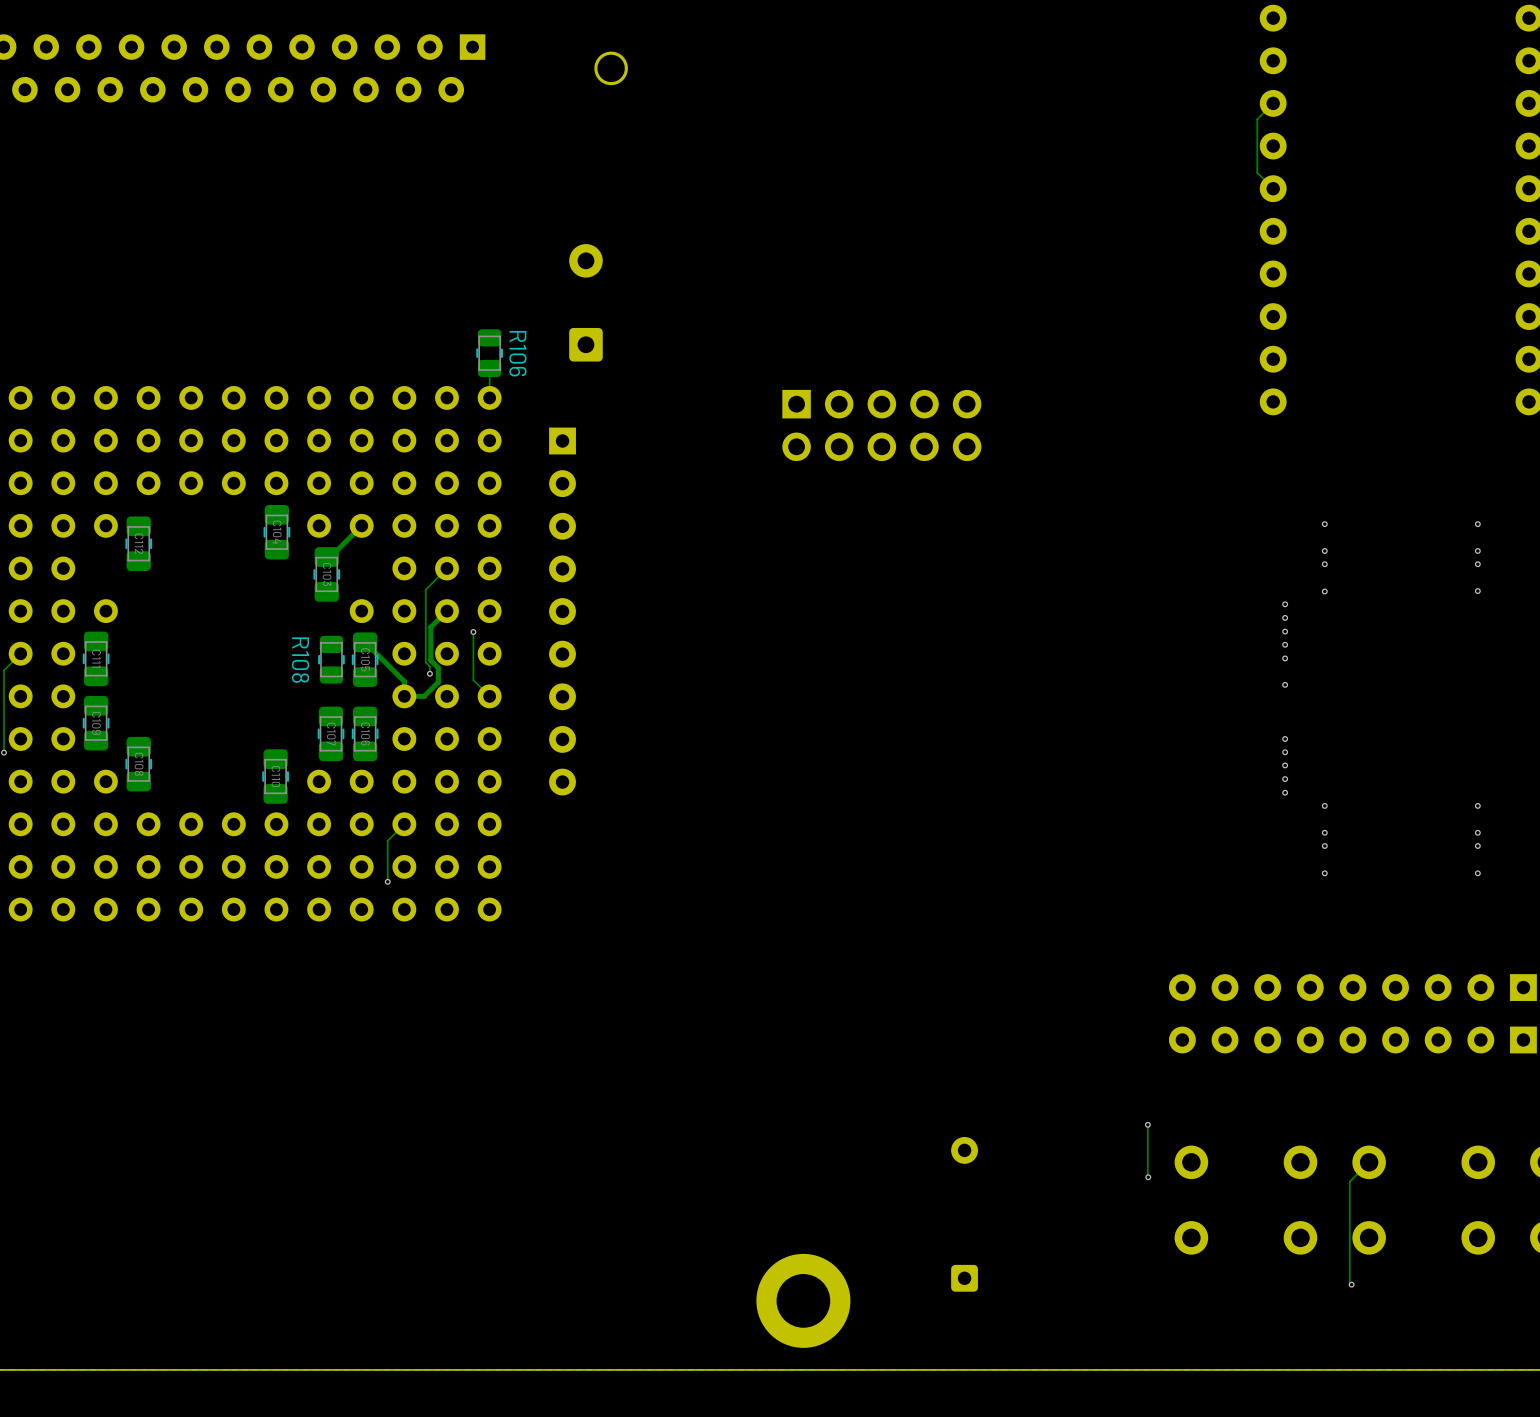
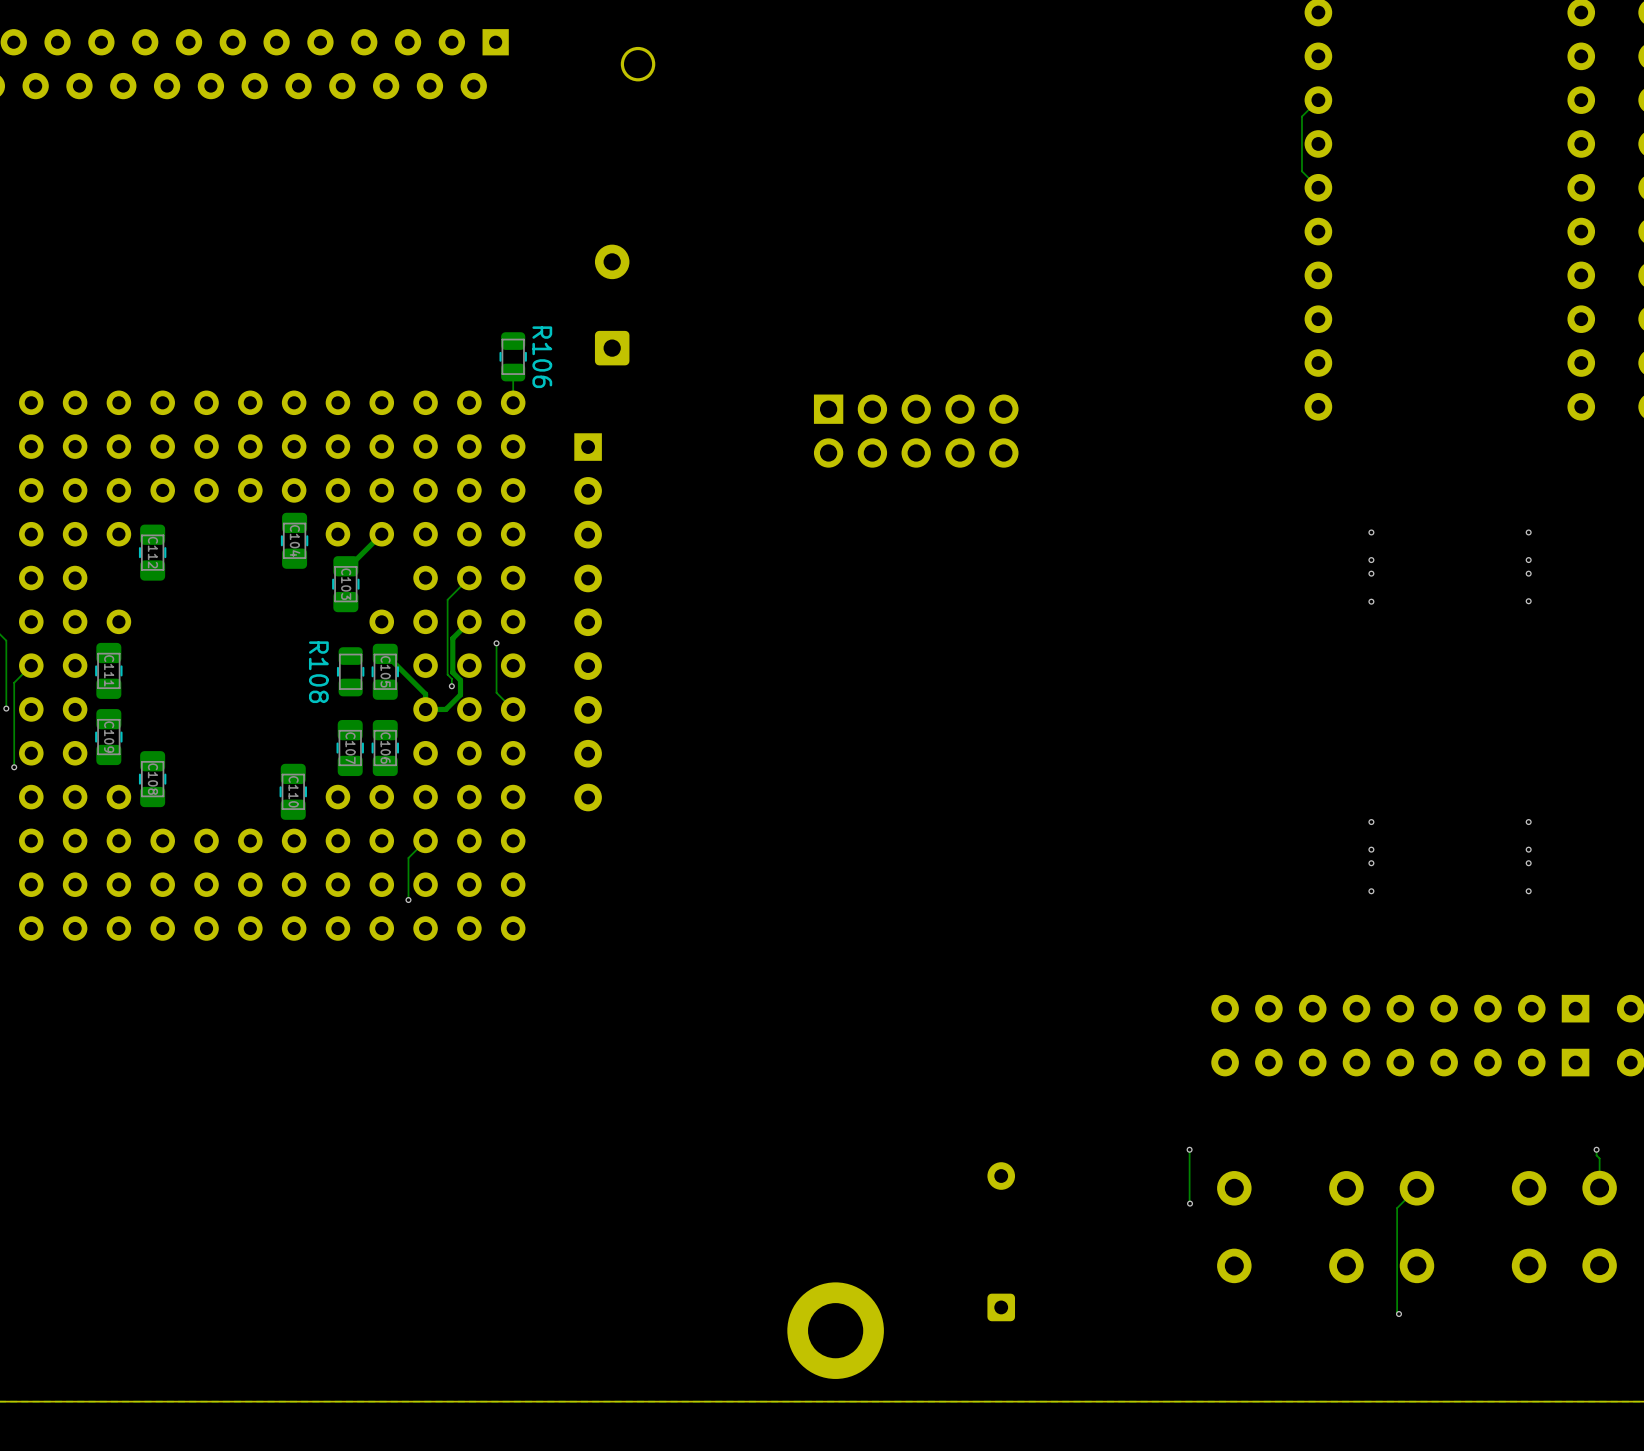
via: (1285, 604) -> none
via: (1285, 617) -> none
via: (1285, 631) -> none
via: (1285, 644) -> none
via: (1285, 658) -> none
via: (1285, 684) -> none
via: (1285, 739) -> none
via: (1285, 752) -> none
via: (1285, 765) -> none
via: (1285, 779) -> none
via: (1285, 792) -> none

